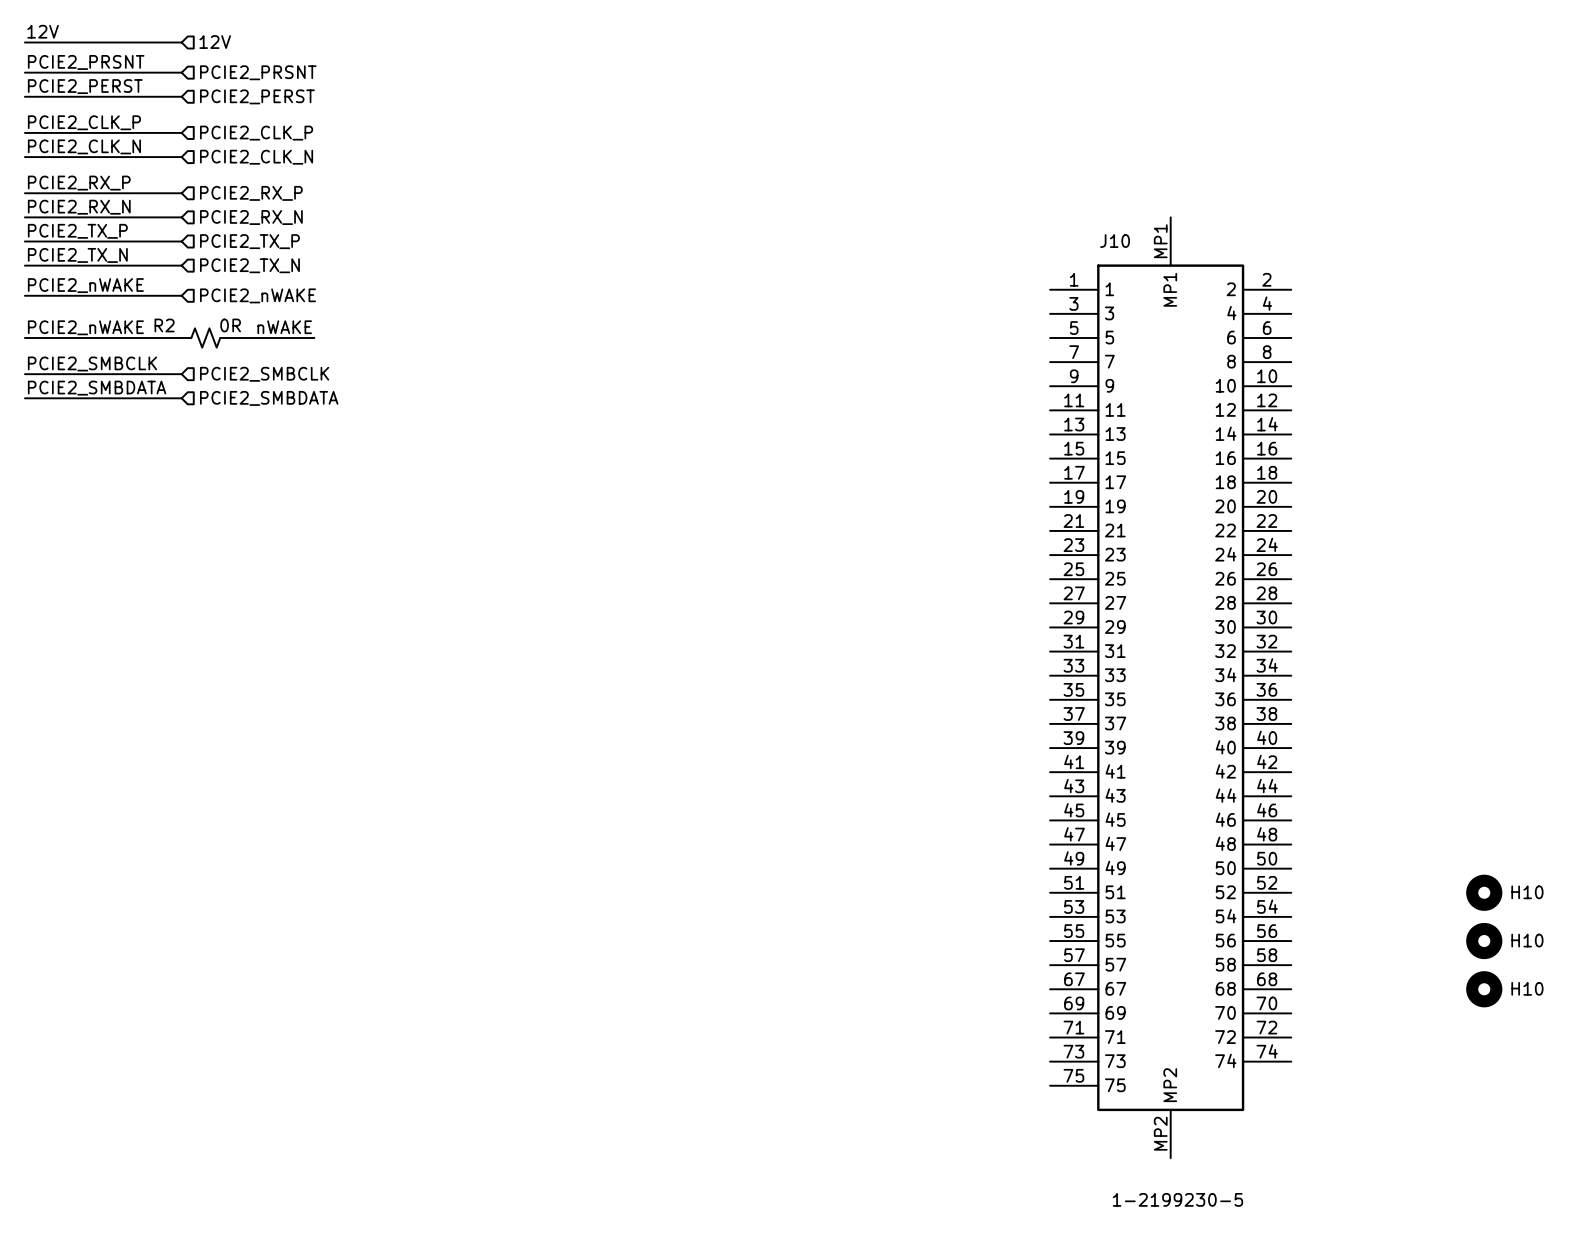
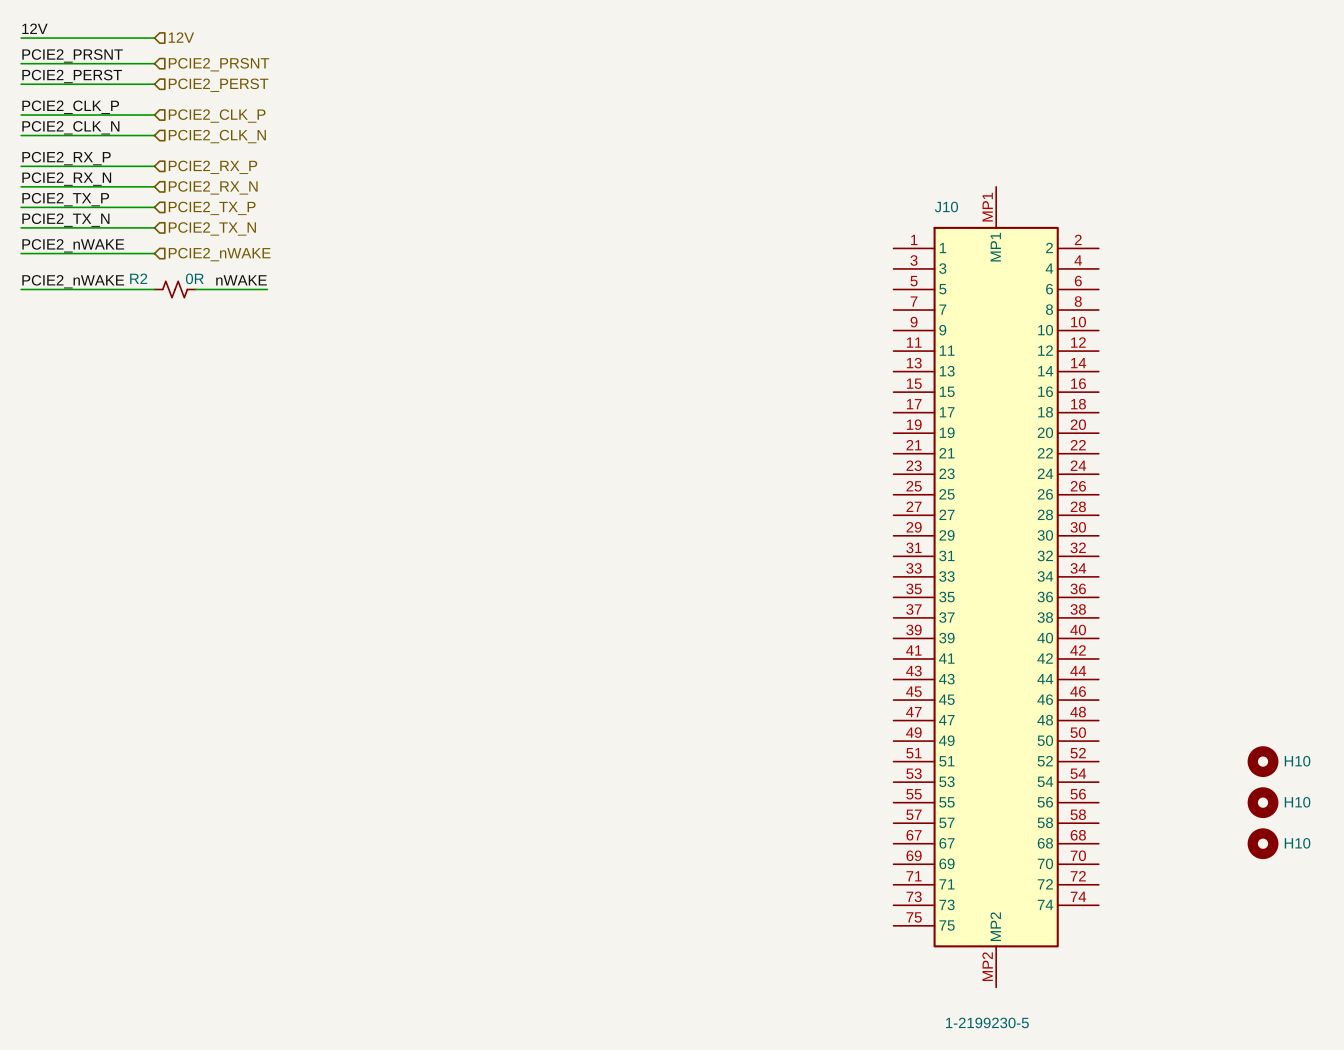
label: PCIE2_SMBCLK (92, 363) -> none
wire: (24, 374) (181, 374) -> none
hierarchical label: PCIE2_SMBCLK (264, 374) -> none
label: PCIE2_SMBDATA (97, 388) -> none
wire: (24, 398) (181, 398) -> none
hierarchical label: PCIE2_SMBDATA (269, 398) -> none

